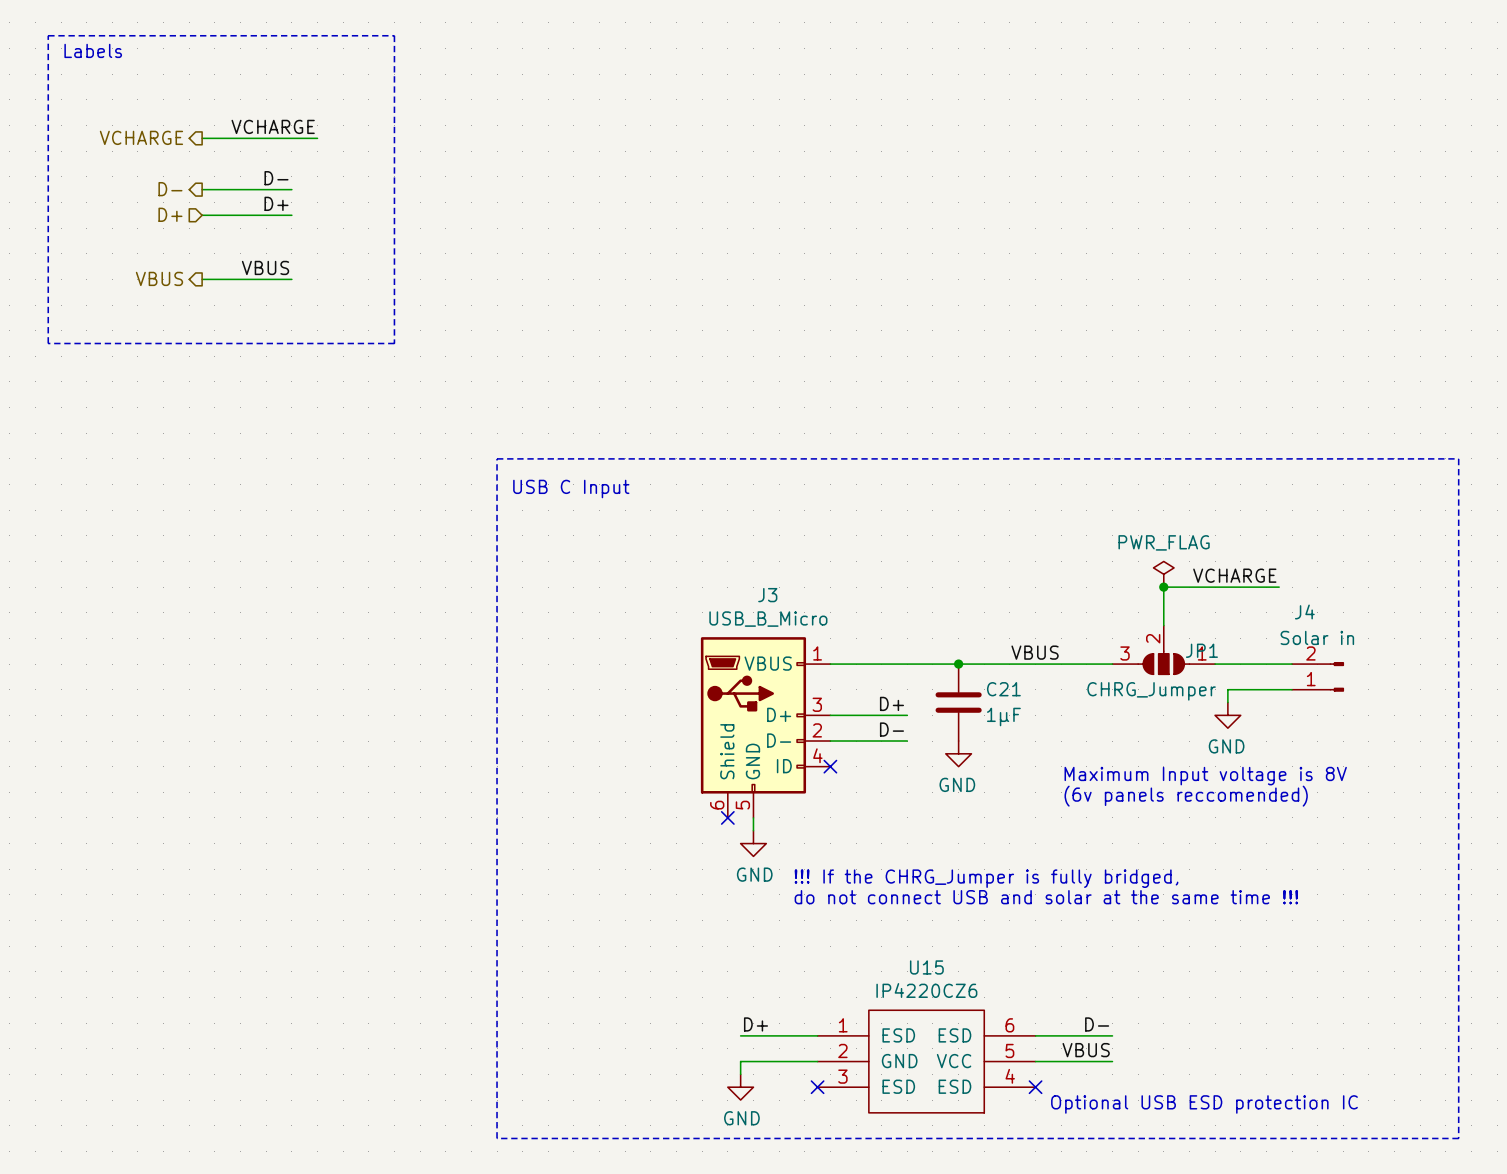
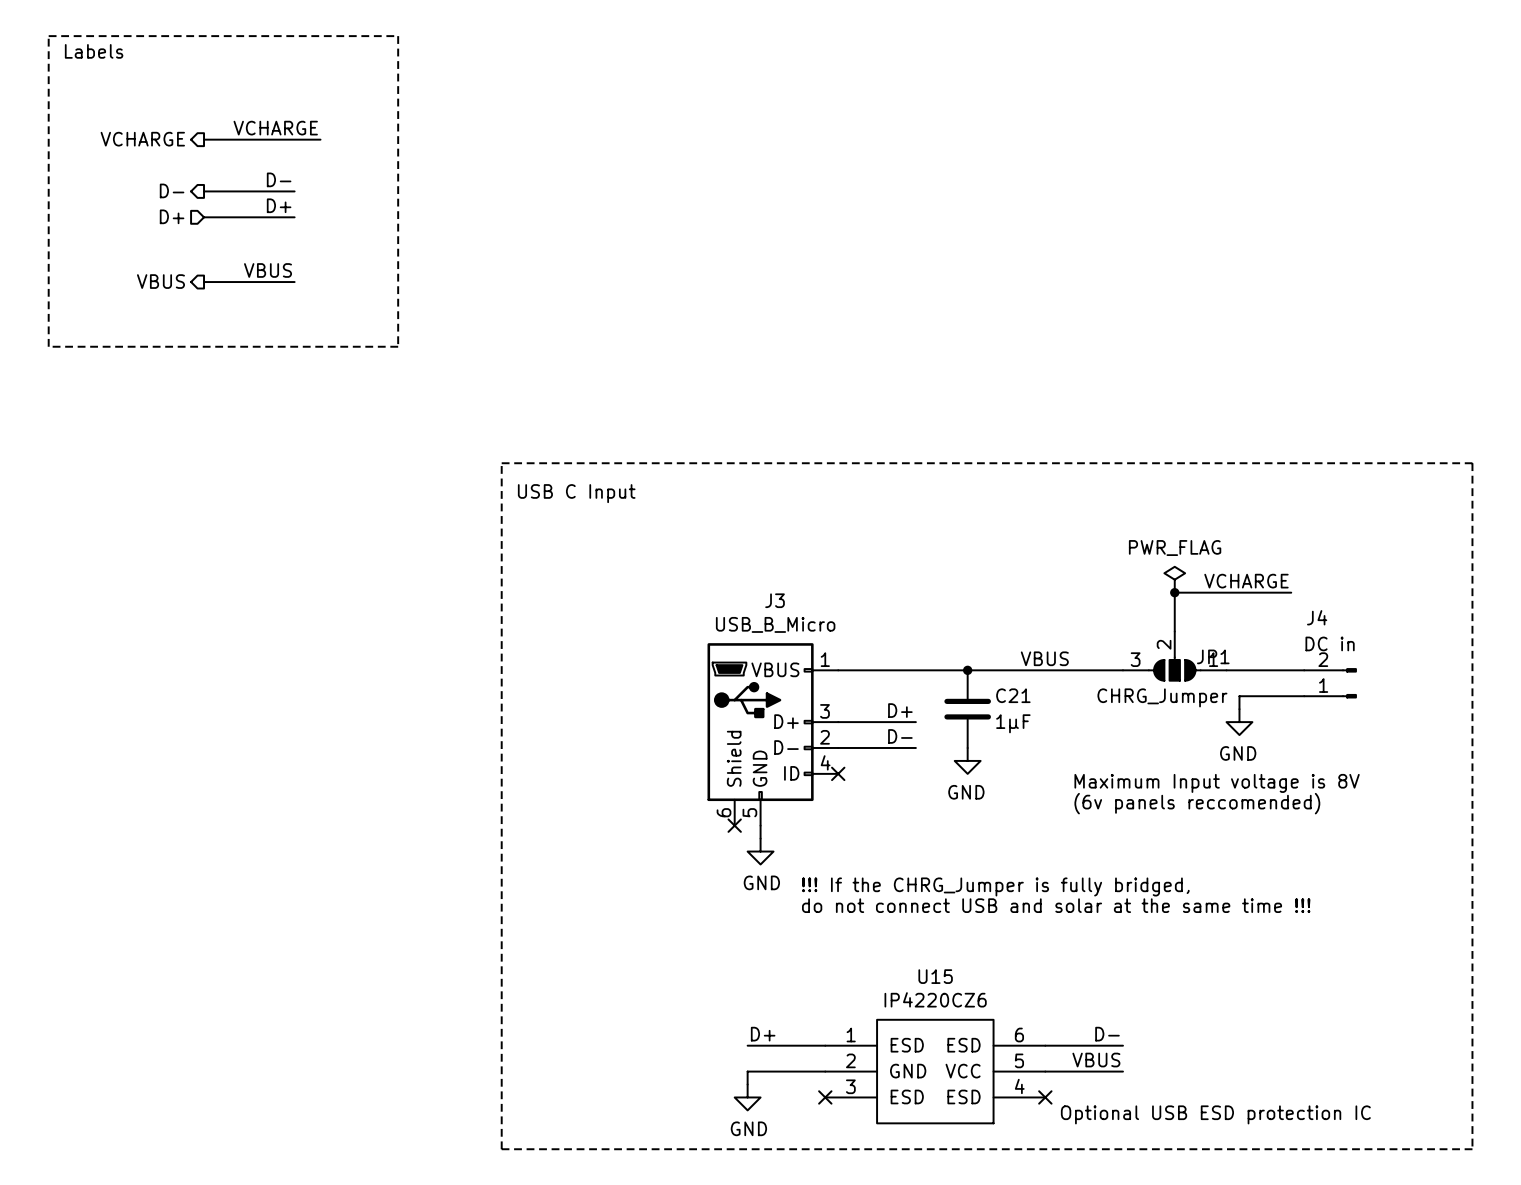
J4 value: Solar in (1317, 637) -> DC in (1330, 643)

